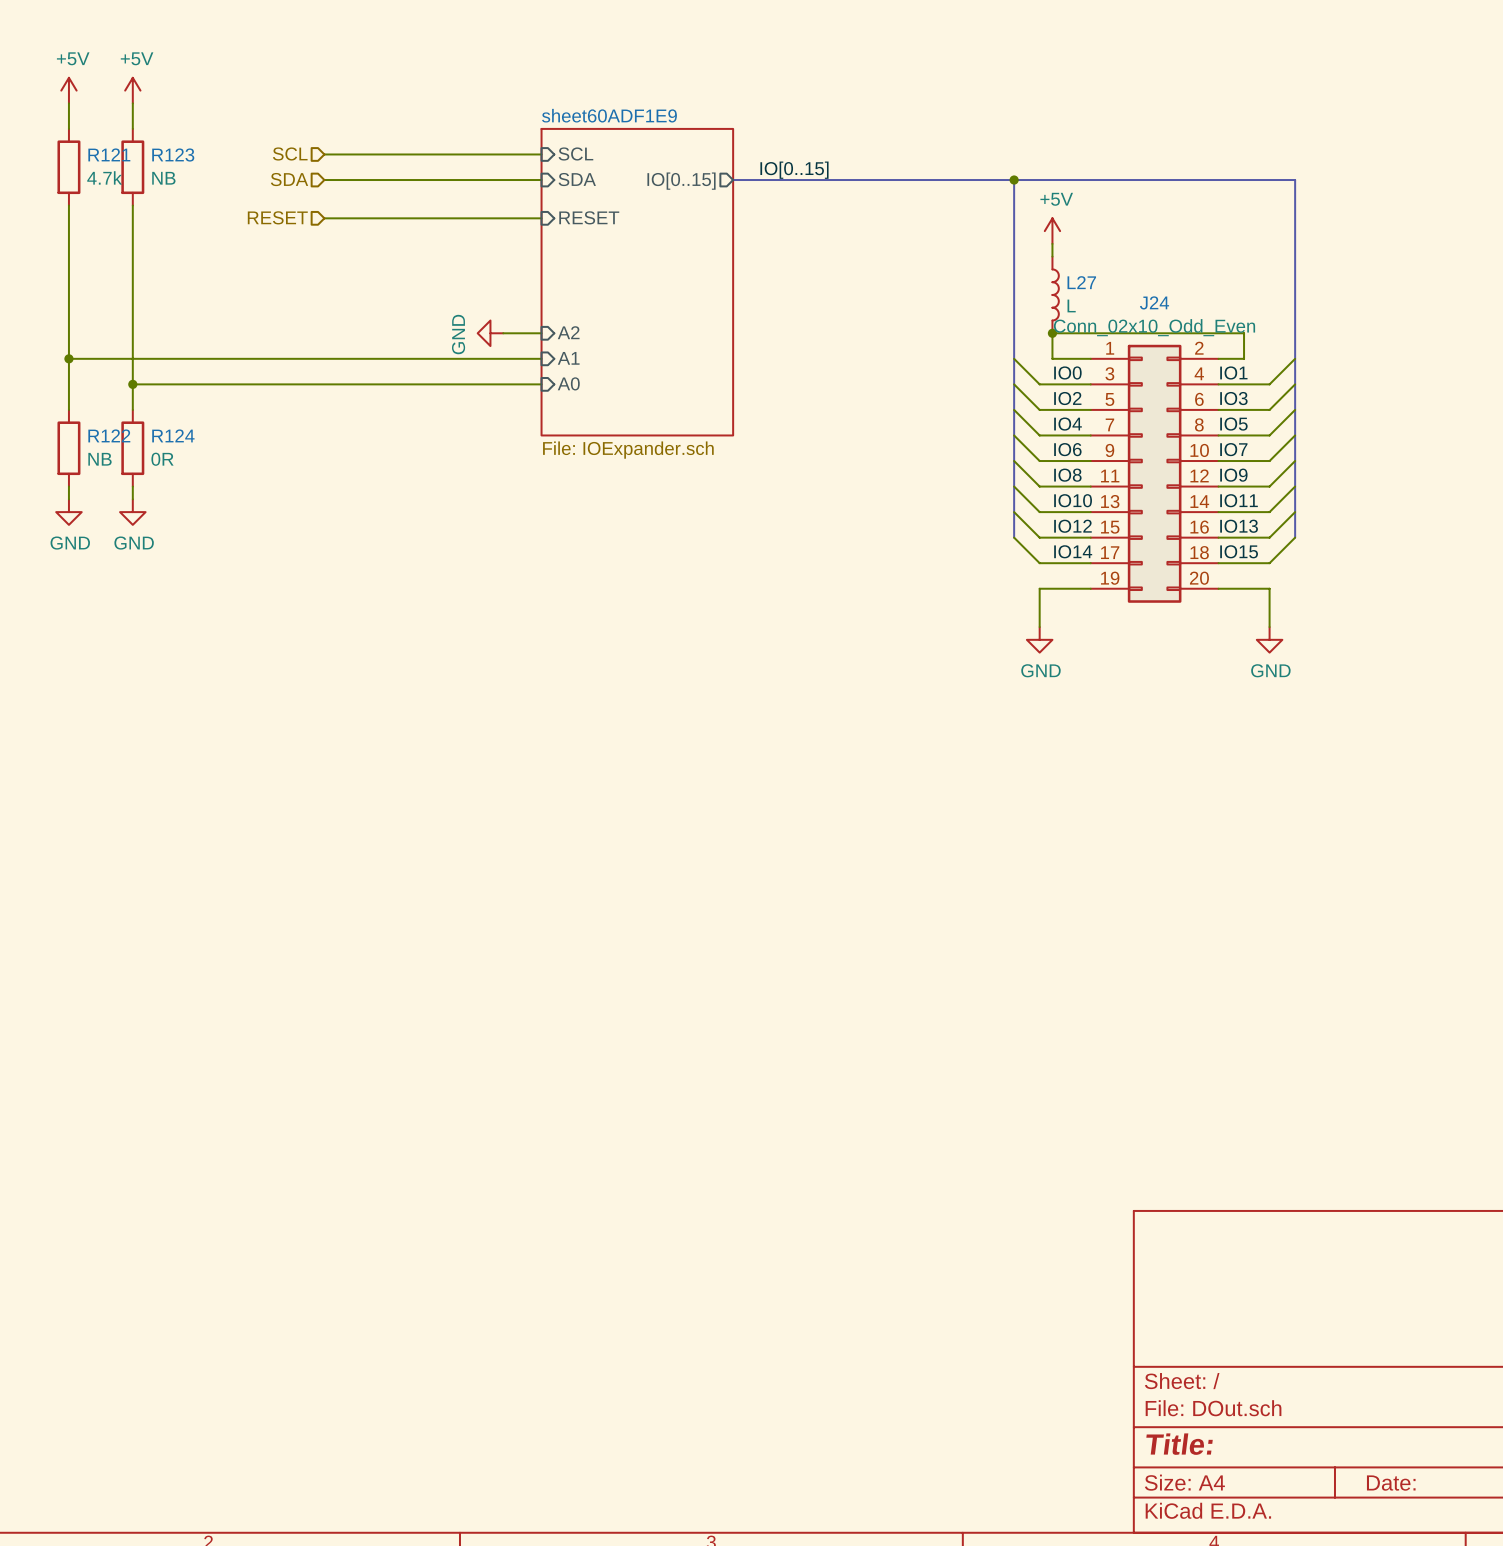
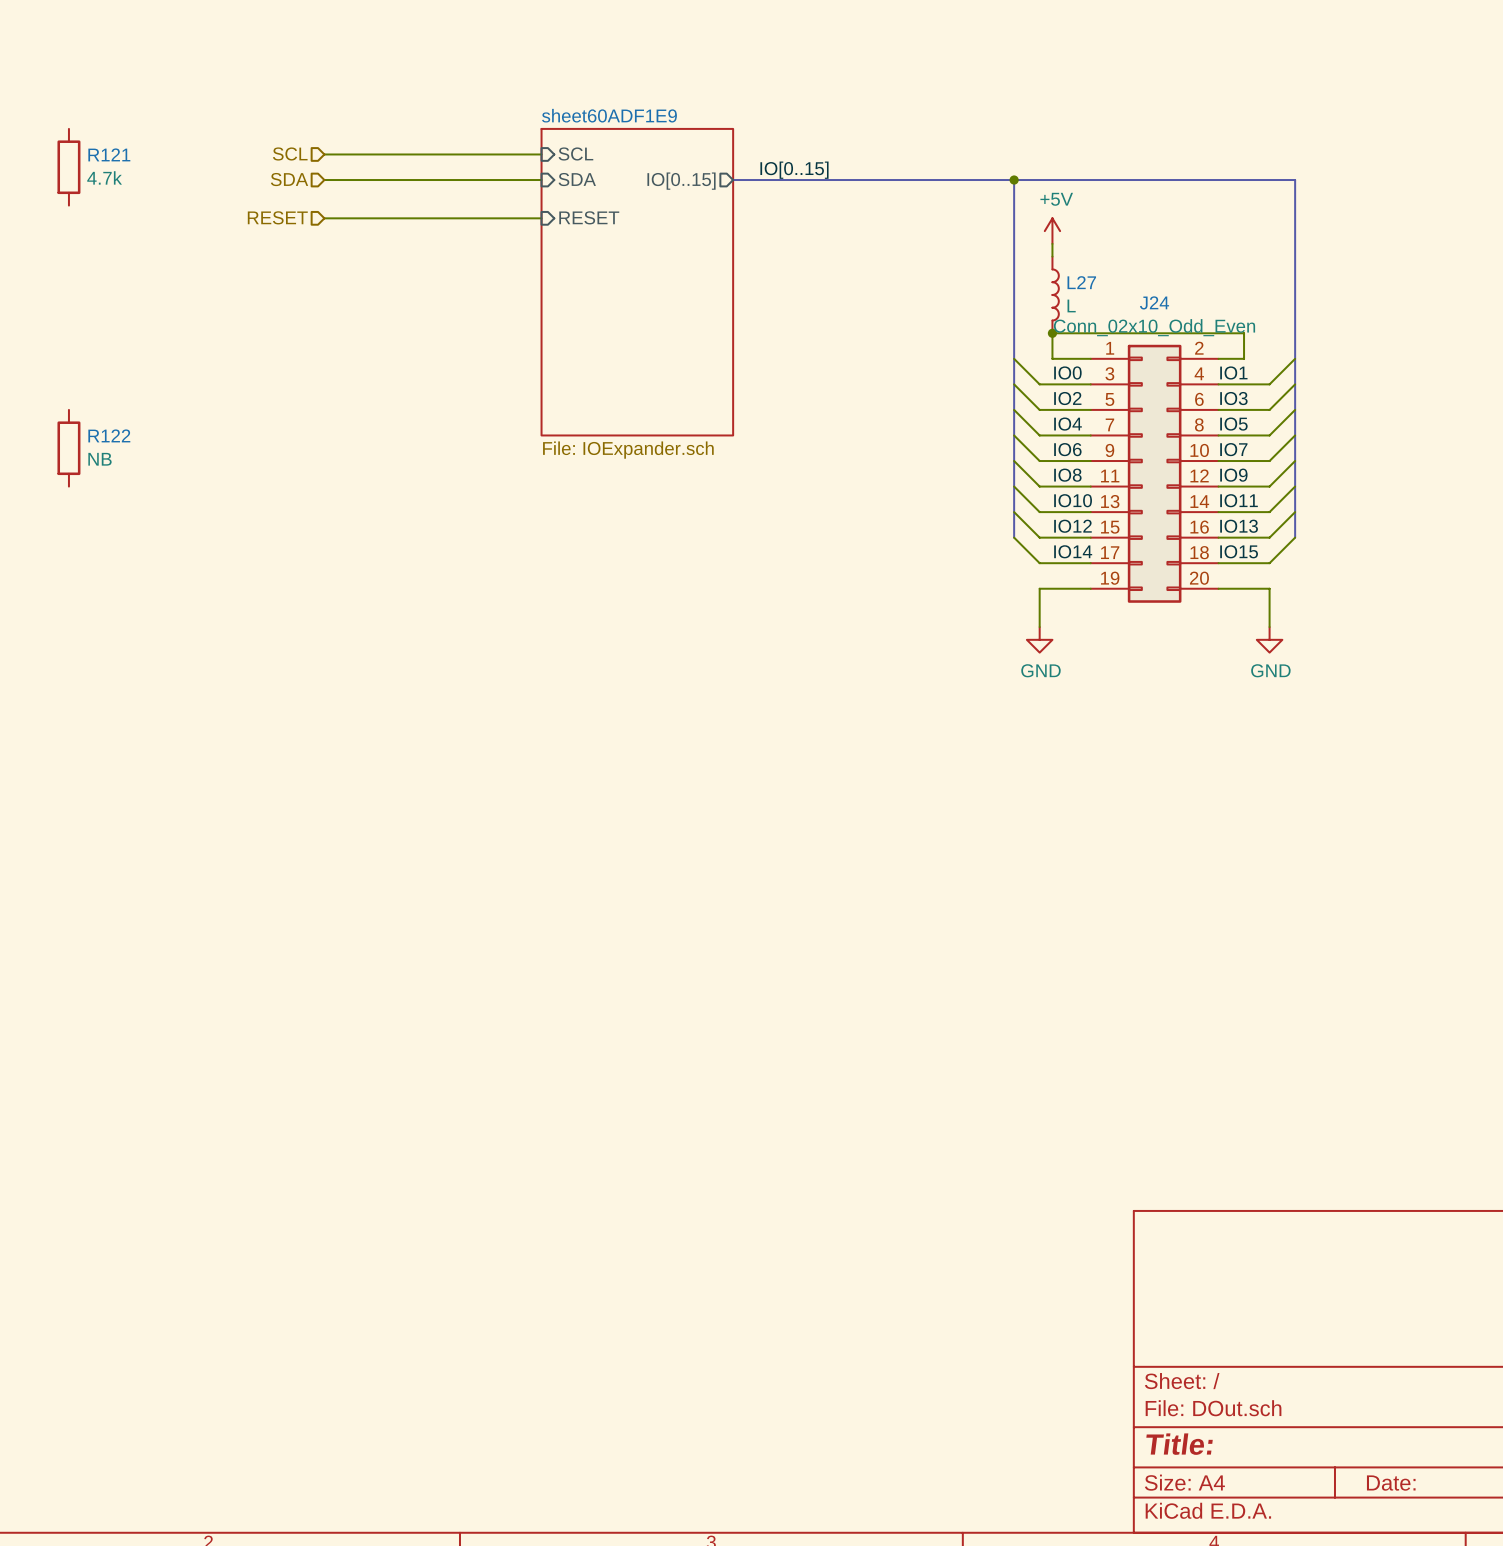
power symbol: +5V (68, 90) -> none
power symbol: +5V (132, 90) -> none
wire: (68, 103) (68, 128) -> none
wire: (132, 103) (132, 128) -> none
R123: NB (132, 167) -> none
wire: (68, 205) (68, 409) -> none
wire: (132, 205) (132, 409) -> none
sheet pin: A2 (568, 332) -> none
power symbol: GND (490, 333) -> none
wire: (503, 333) (541, 333) -> none
wire: (68, 358) (541, 358) -> none
junction: (68, 358) -> none
sheet pin: A1 (568, 358) -> none
sheet pin: A0 (568, 383) -> none
wire: (132, 384) (541, 384) -> none
junction: (132, 384) -> none
R124: 0R (132, 448) -> none
wire: (68, 486) (68, 499) -> none
wire: (132, 486) (132, 499) -> none
power symbol: GND (68, 512) -> none
power symbol: GND (132, 512) -> none

